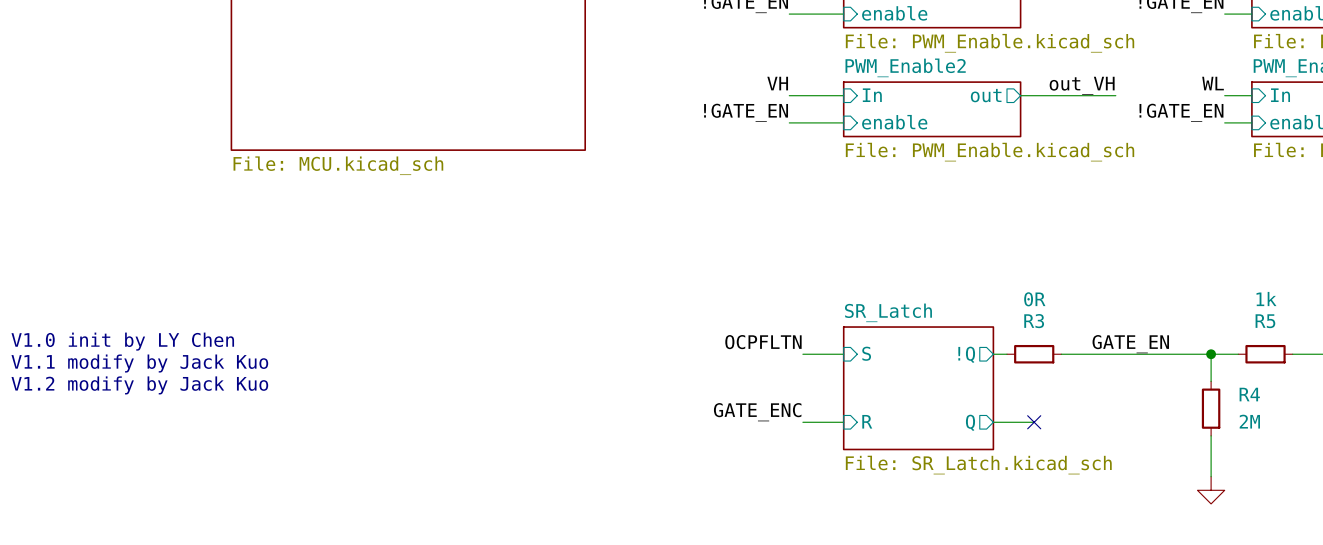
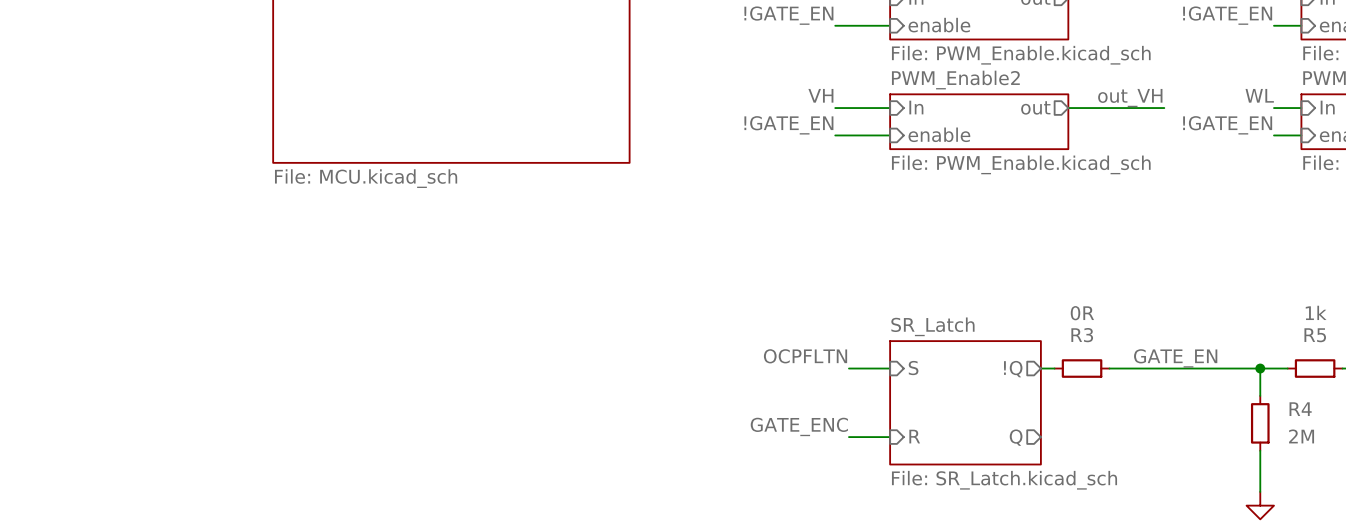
text: V1.0 init by LY Chen (122, 341) -> none
text: V1.1 modify by Jack Kuo (139, 363) -> none
text: V1.2 modify by Jack Kuo (139, 385) -> none
wire: (993, 422) (1034, 422) -> none
no-connect mark: (1034, 422) -> none

